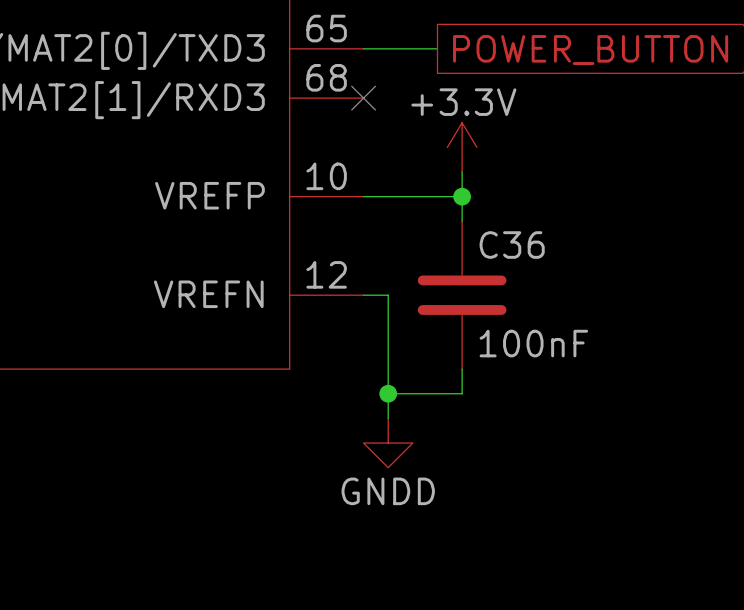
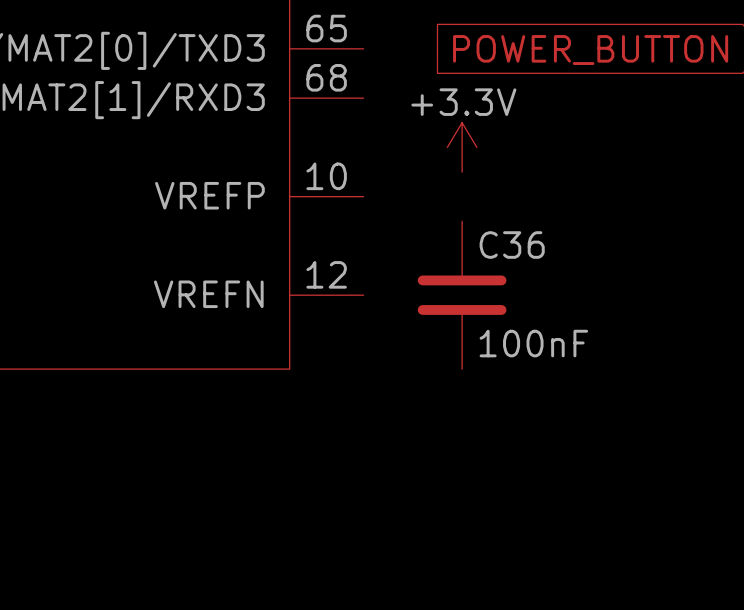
wire: (363, 48) (437, 48) -> none
no-connect mark: (363, 98) -> none
wire: (462, 172) (462, 221) -> none
wire: (363, 196) (462, 196) -> none
junction: (462, 196) -> none
wire: (363, 295) (388, 295) (388, 418) -> none
wire: (462, 369) (462, 393) (388, 393) -> none
junction: (388, 393) -> none
power symbol: GNDD (388, 443) -> none

